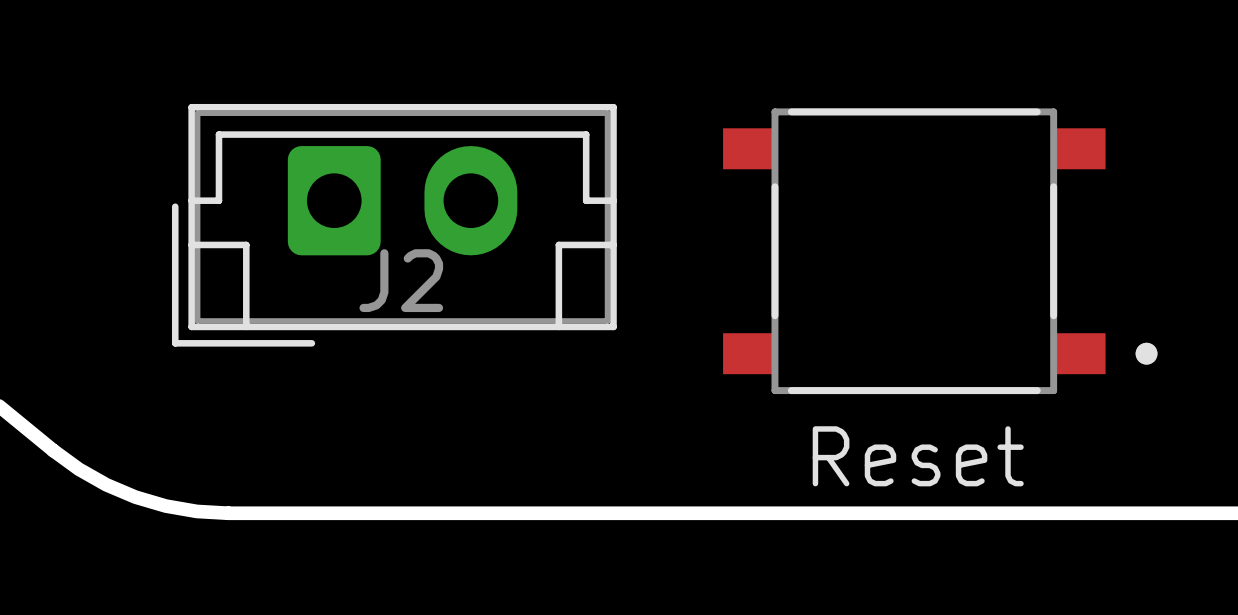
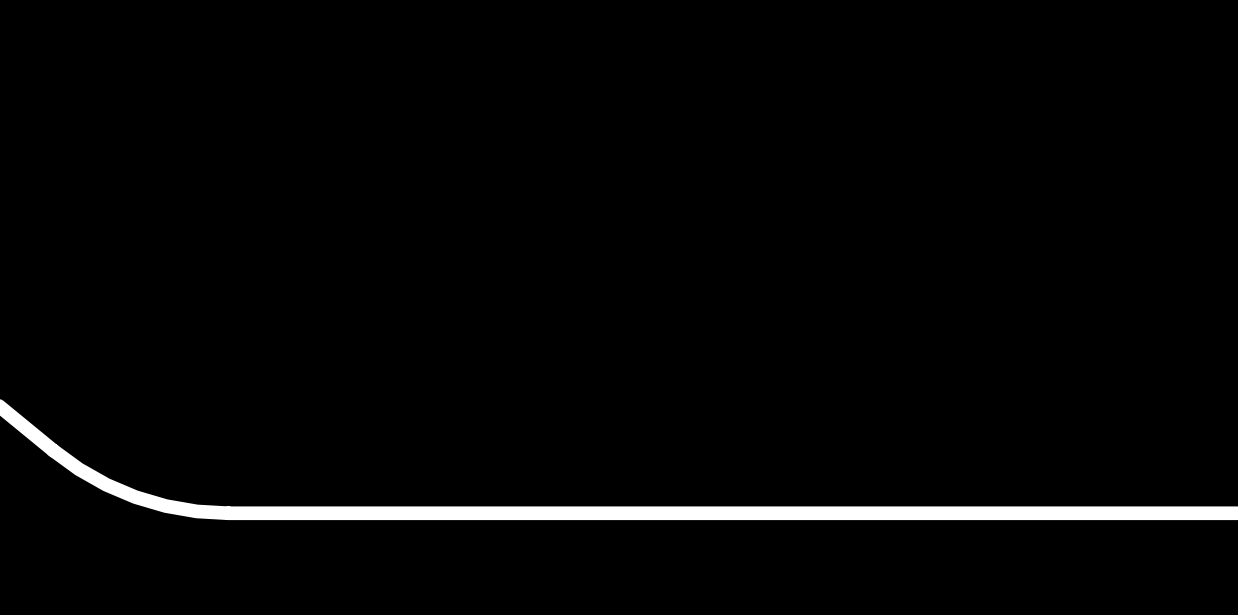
J2: (394, 225) -> none
part: (940, 251) -> none
text: Reset (918, 456) -> none

